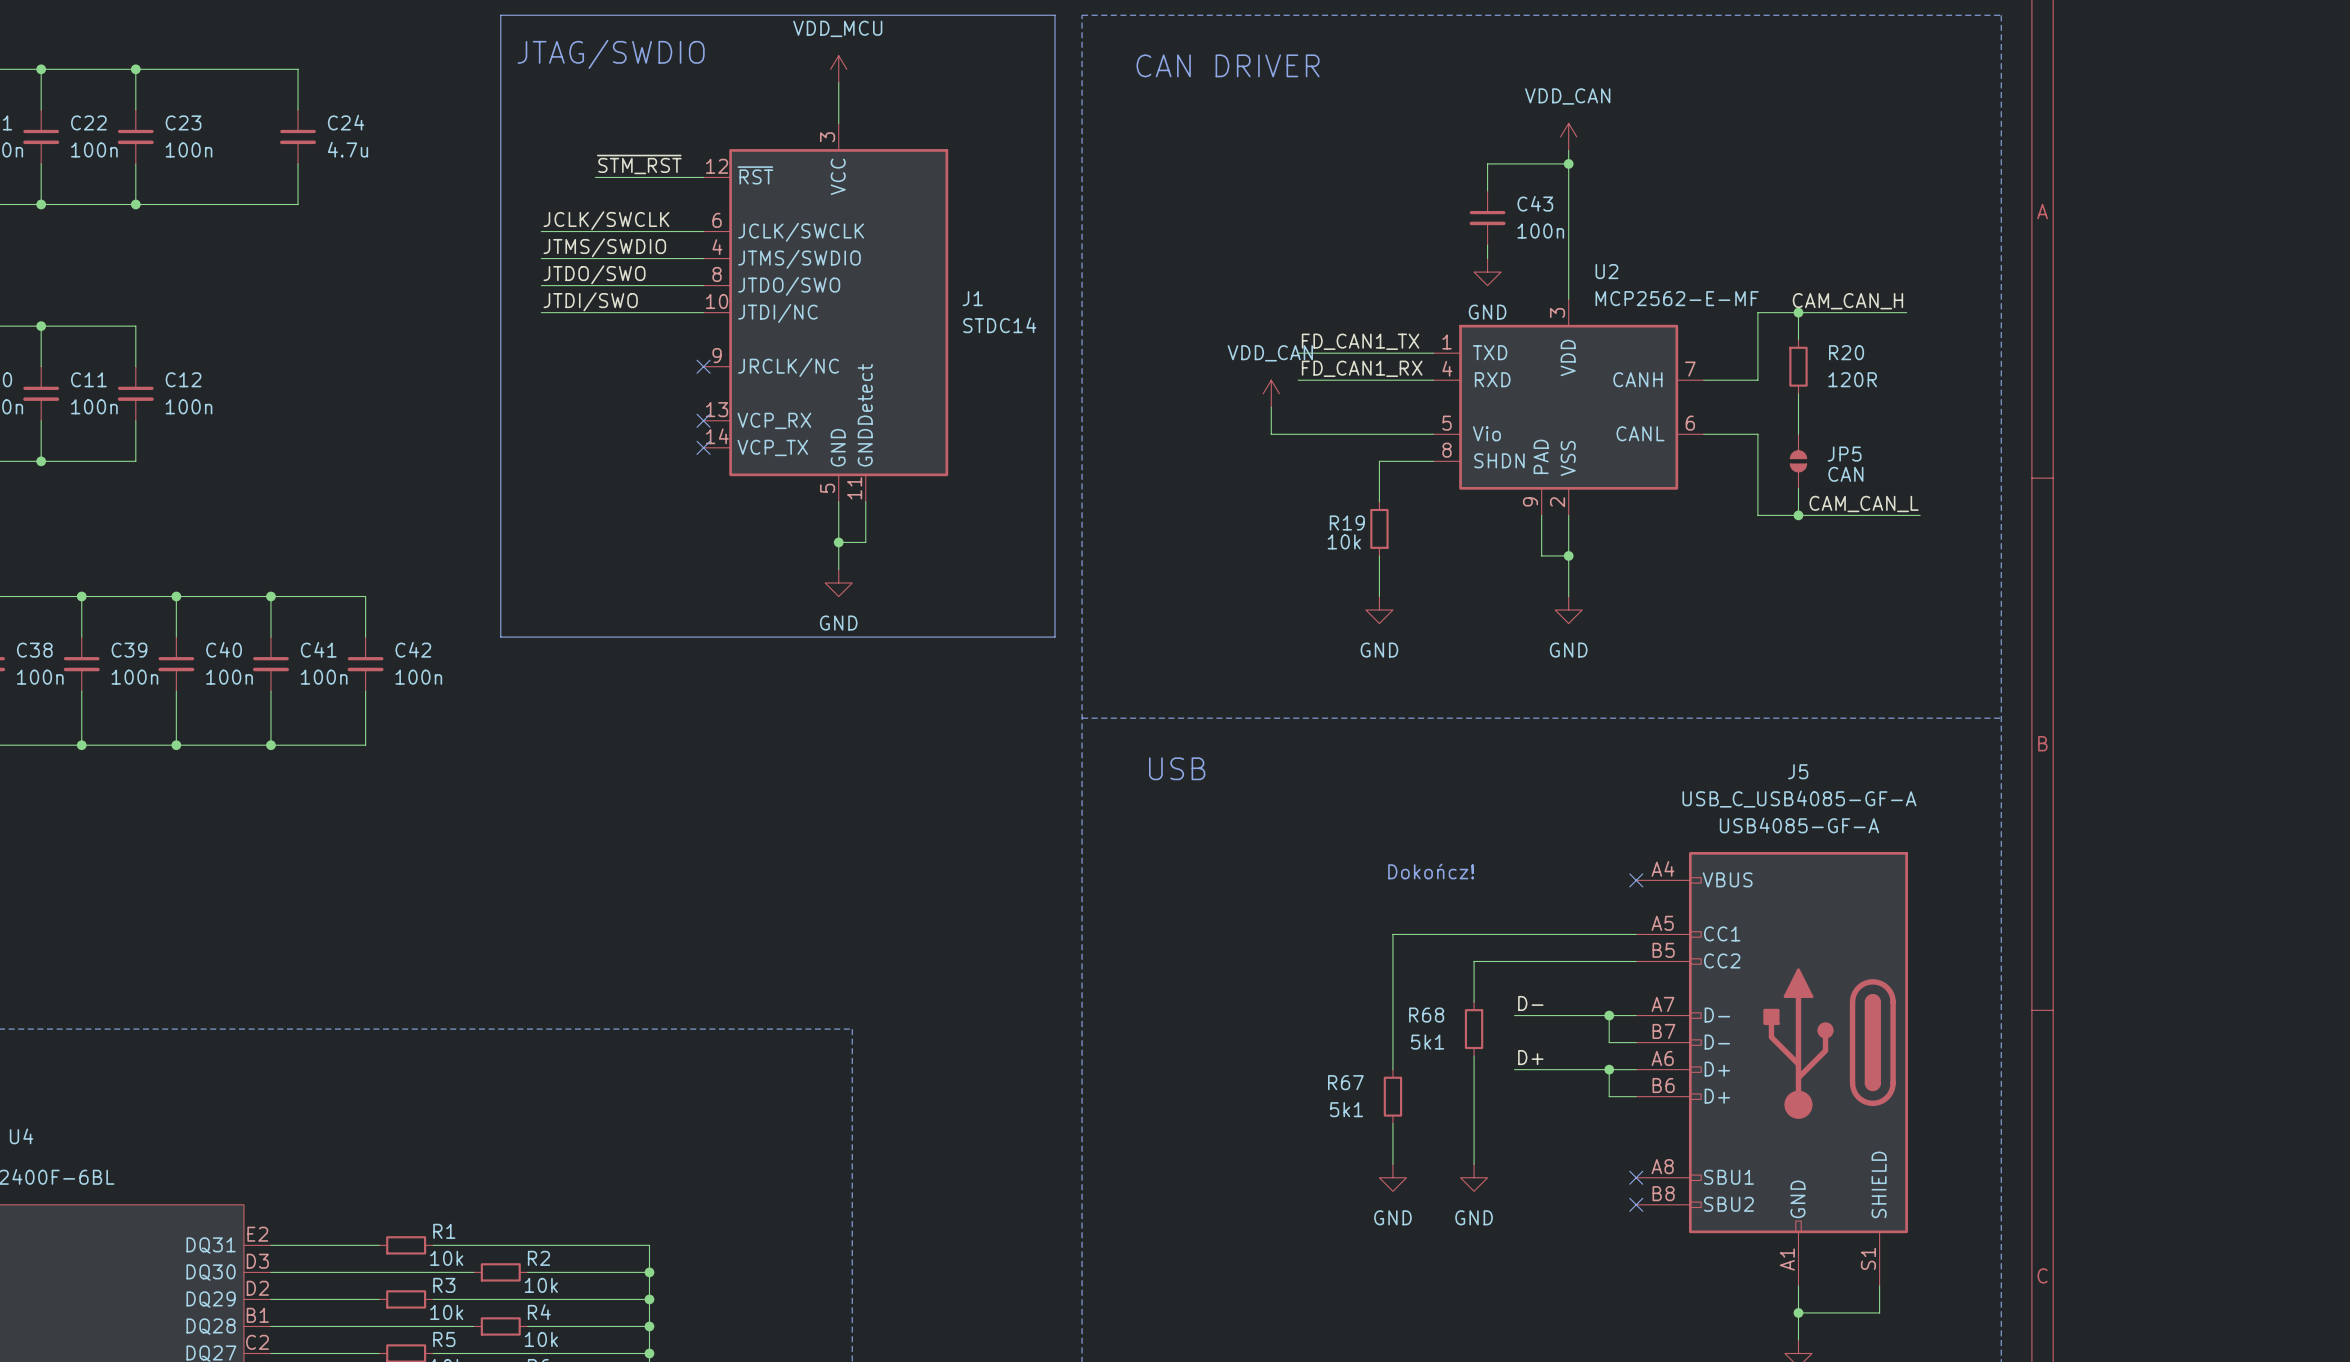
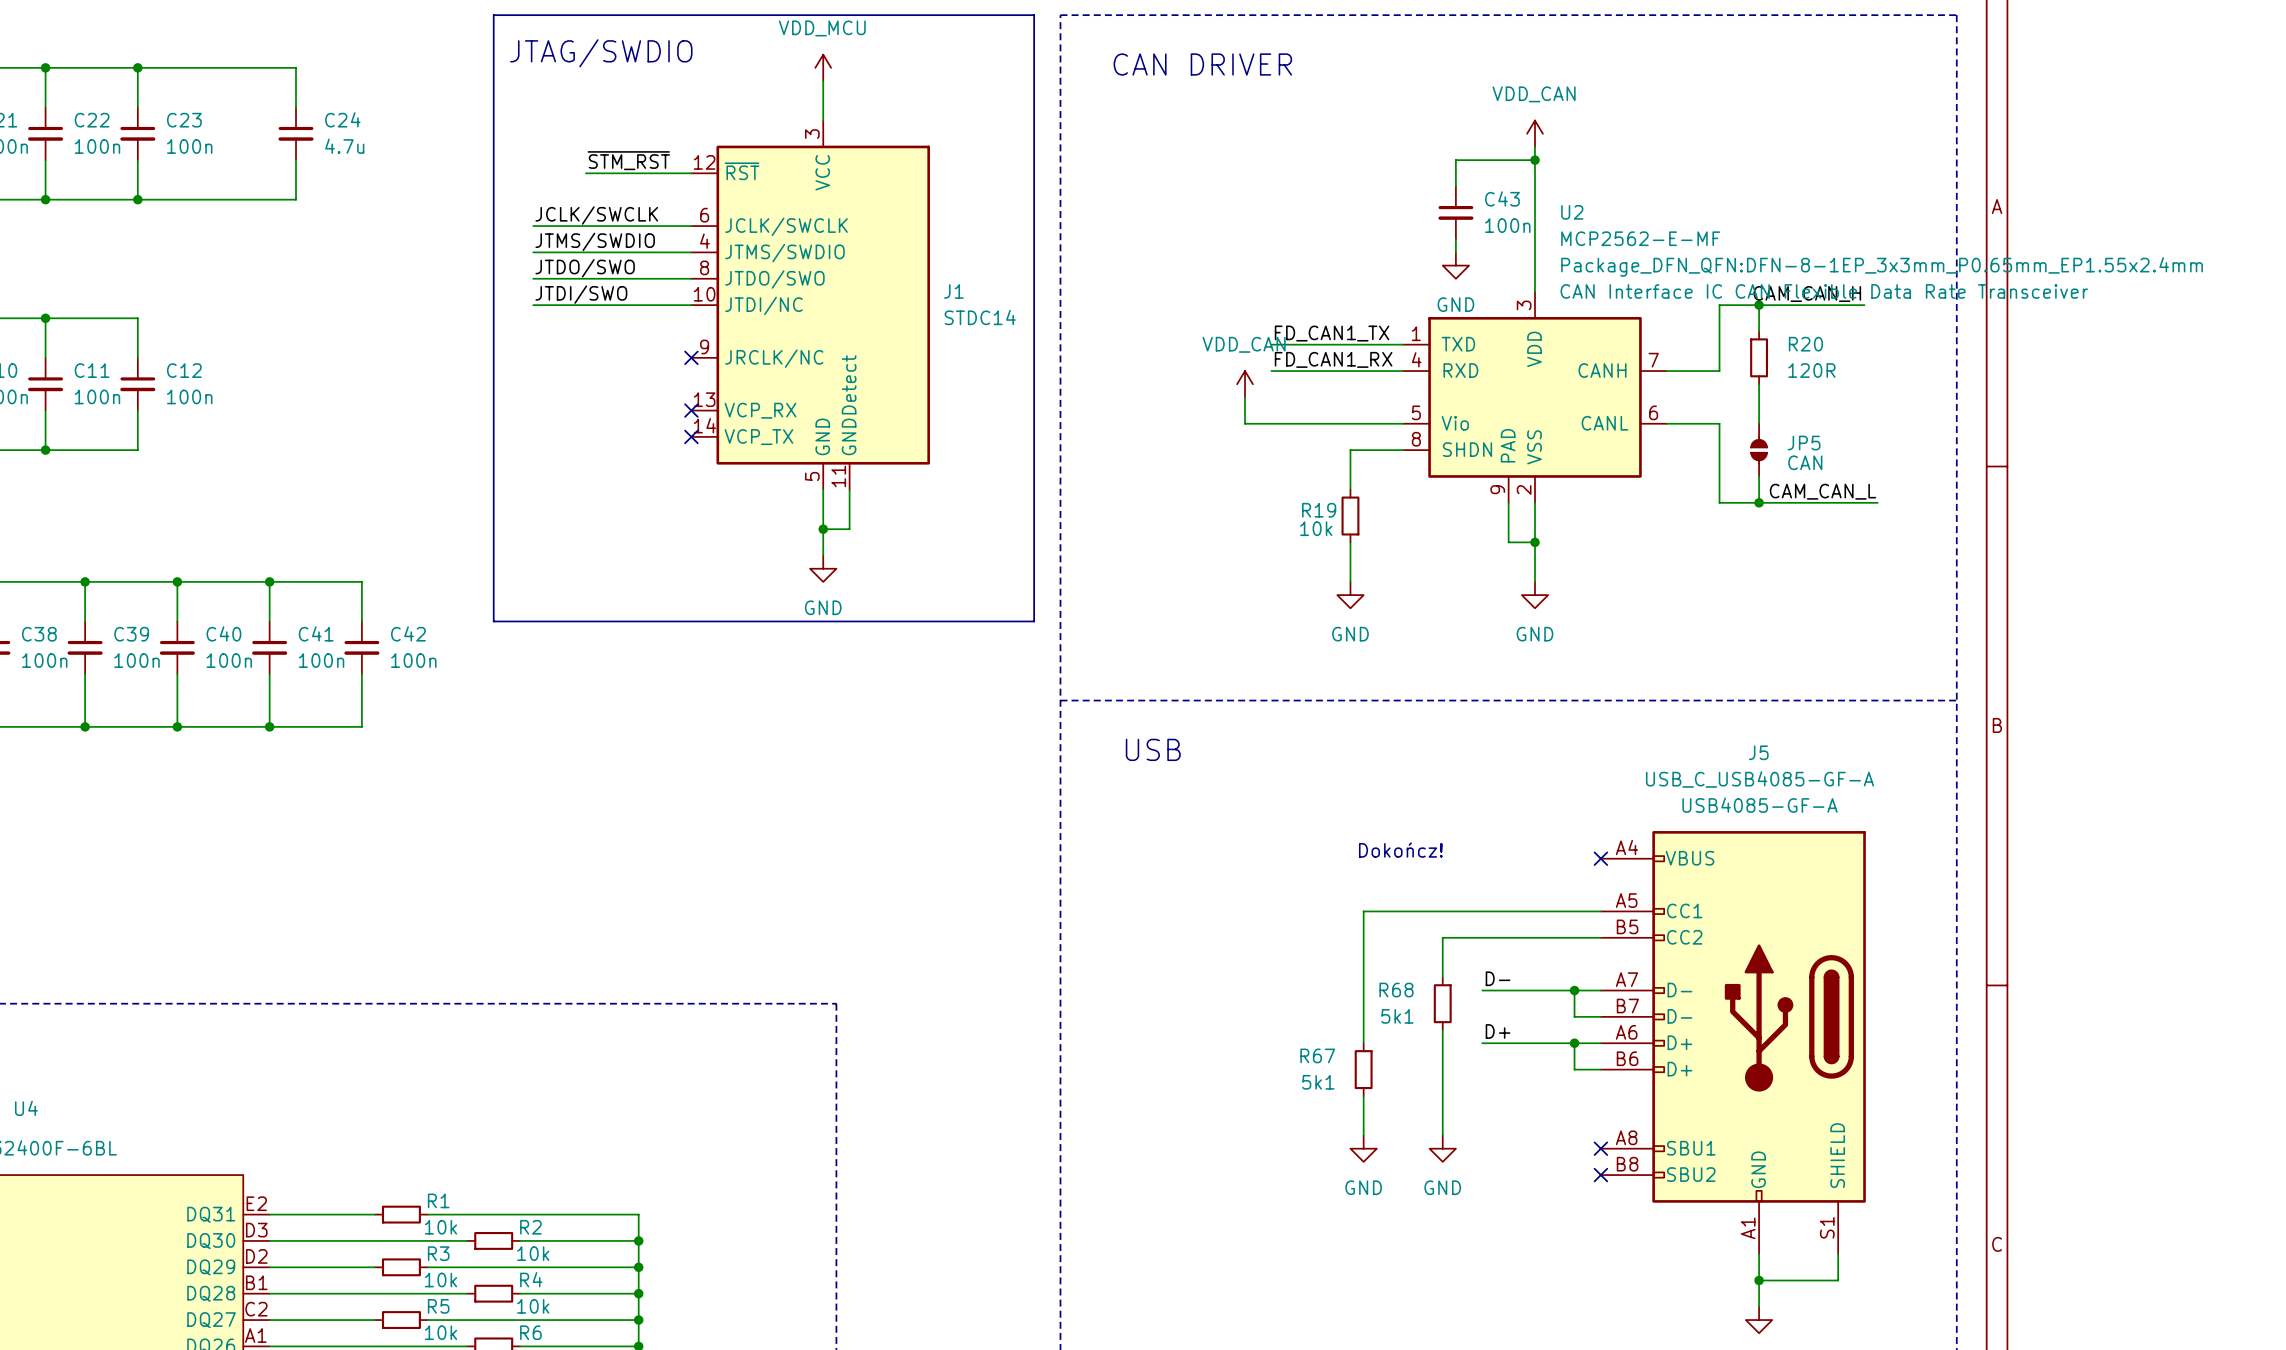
U2 name position: U2 (1606, 271) -> U2 (1572, 212)
U2 text: none -> Package_DFN_QFN:DFN-8-1EP_3x3mm_P0.65mm_EP1.55x2.4mm (1882, 266)
U2 value position: MCP2562-E-MF (1677, 298) -> MCP2562-E-MF (1640, 238)
U2 text: none -> CAN Interface IC CAN Flexible Data Rate Transceiver (1824, 291)

